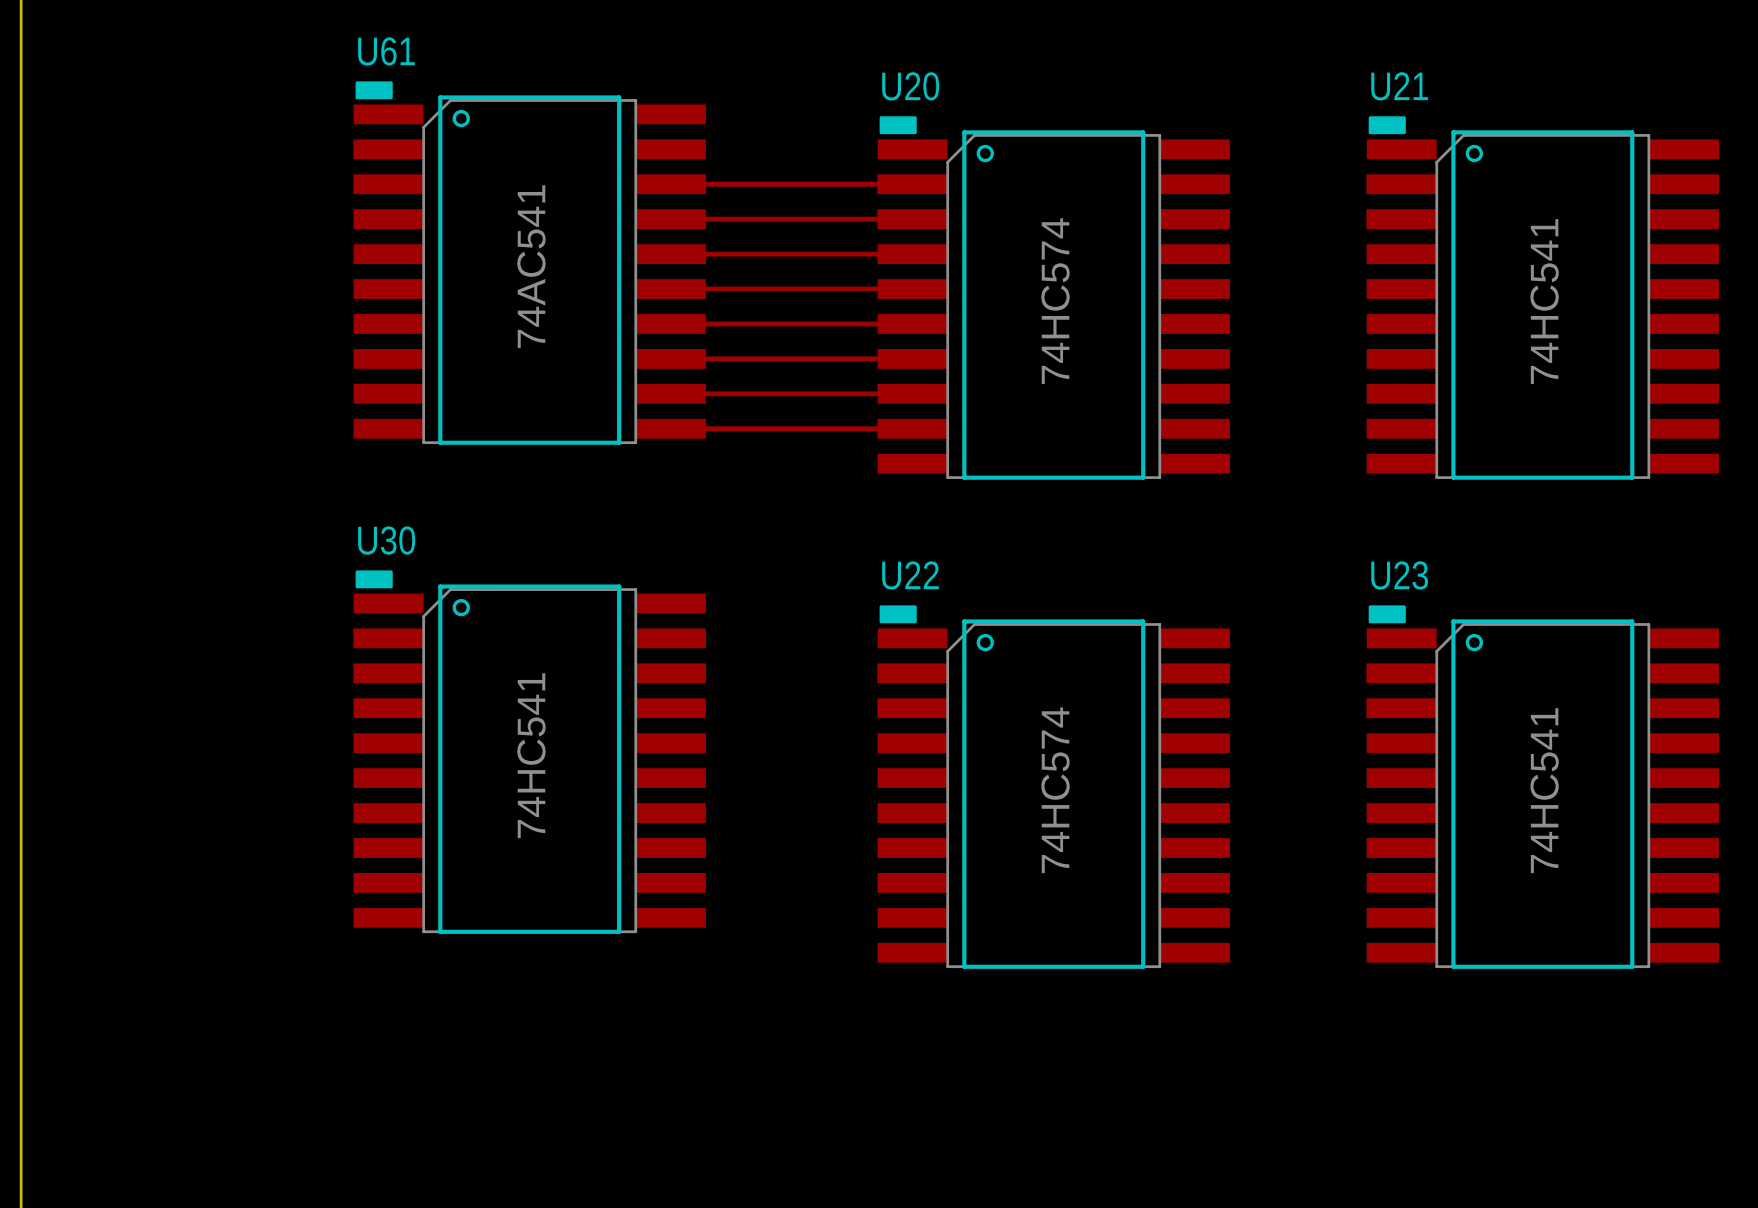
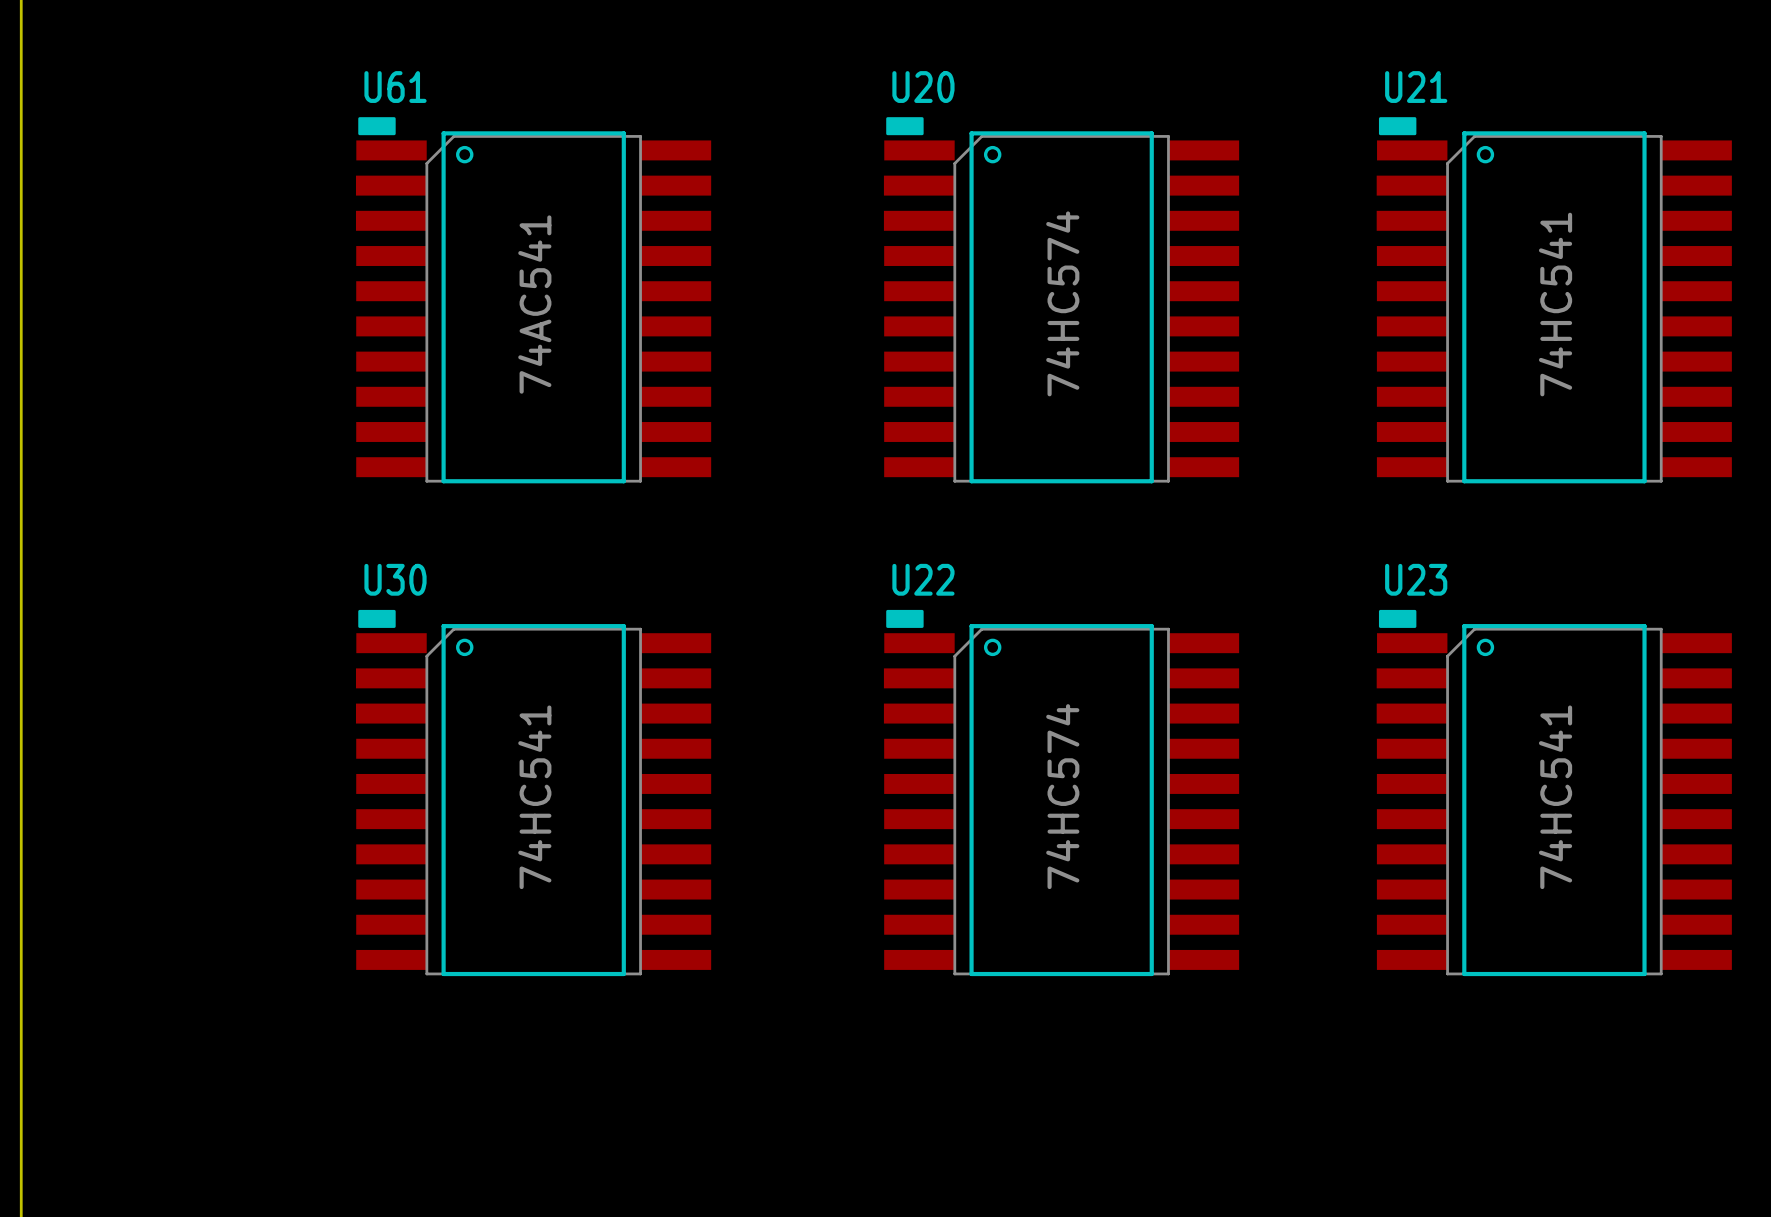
top track: (670, 184) (916, 184) -> none
top track: (670, 219) (916, 219) -> none
top track: (670, 254) (916, 254) -> none
U61 position: (529, 263) -> (533, 300)
top track: (670, 289) (916, 289) -> none
top track: (670, 323) (916, 323) -> none
top track: (670, 358) (916, 358) -> none
top track: (670, 393) (916, 393) -> none
top track: (670, 428) (916, 428) -> none
U30 position: (529, 752) -> (533, 793)

